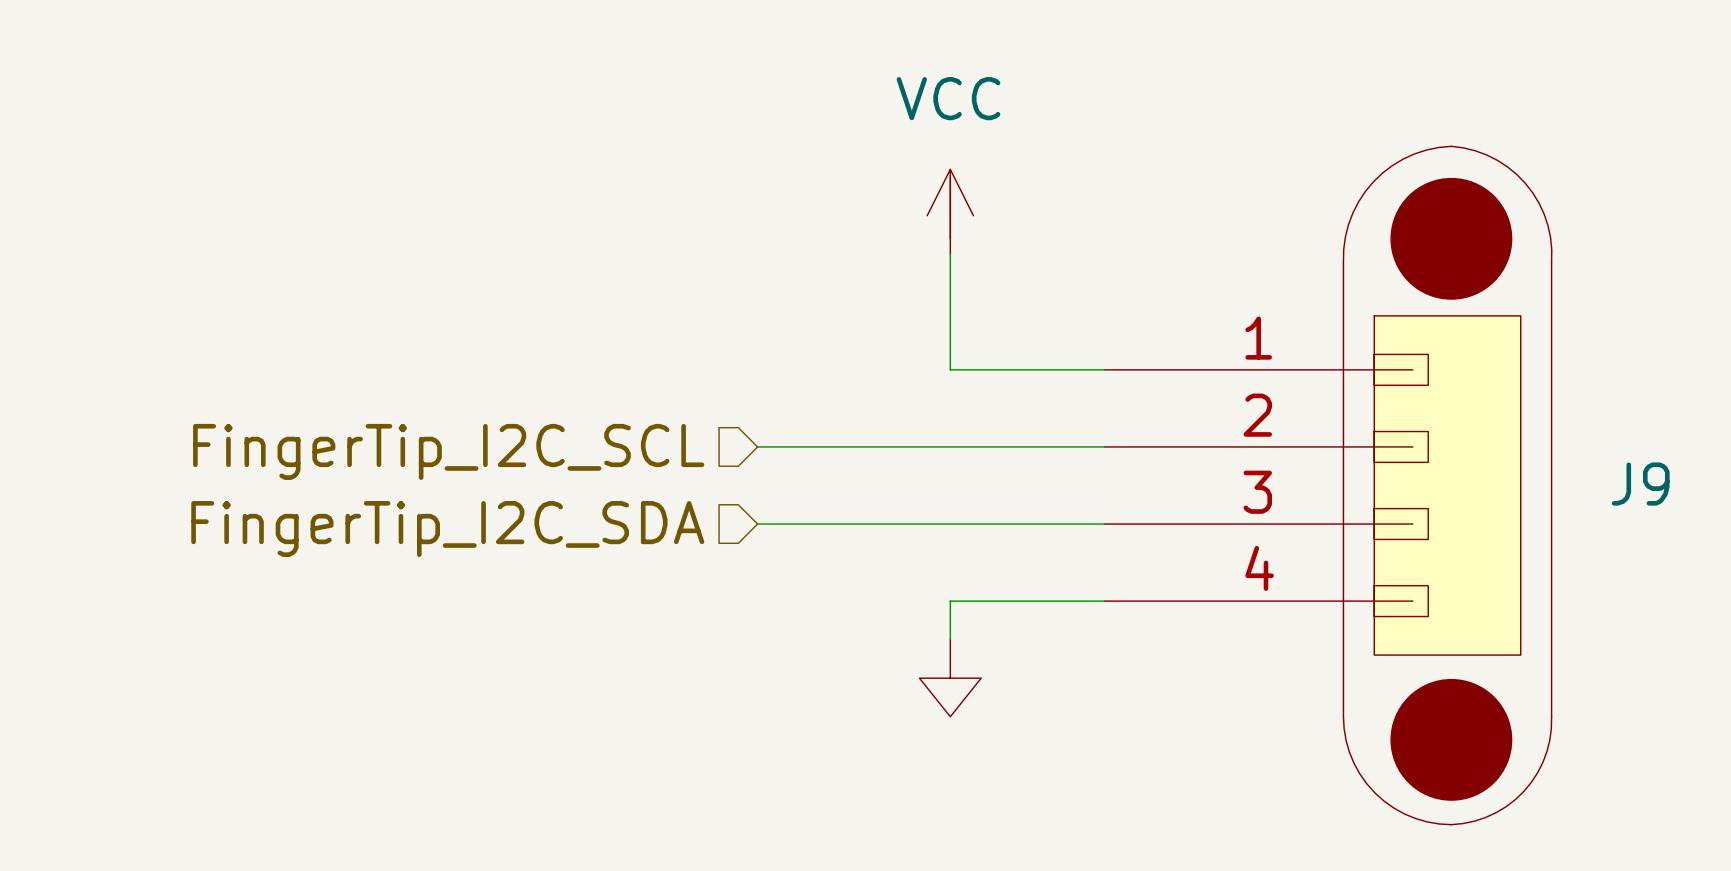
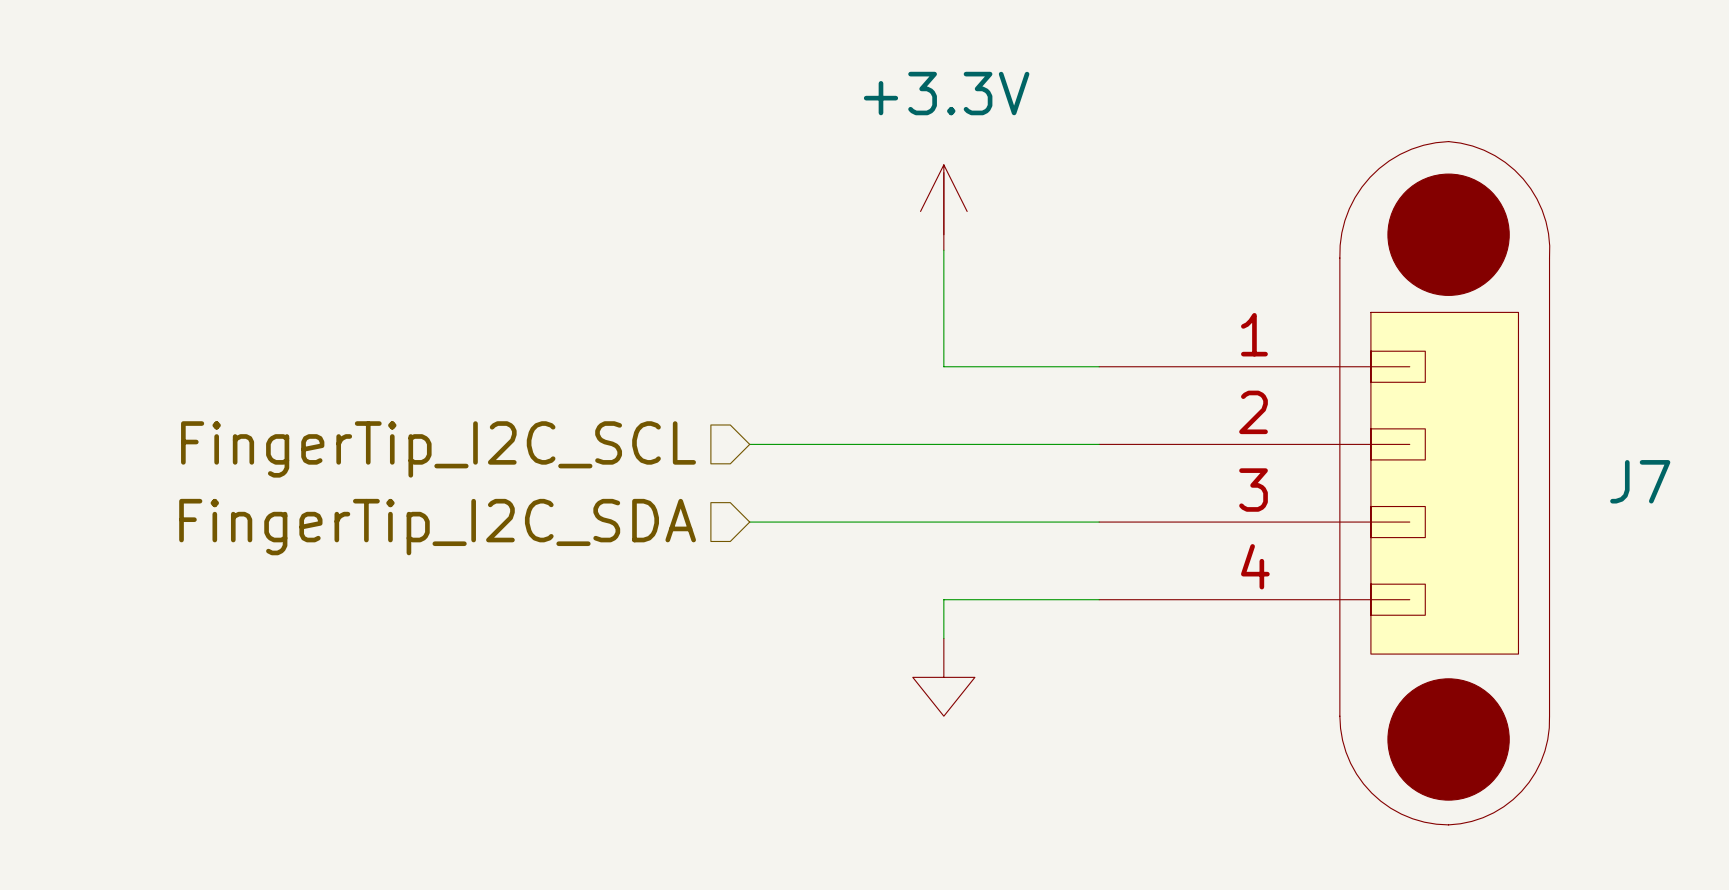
power symbol: VCC (950, 211) -> +3.3V (943, 207)
J9 name: J9 (1640, 484) -> J7 (1640, 481)

